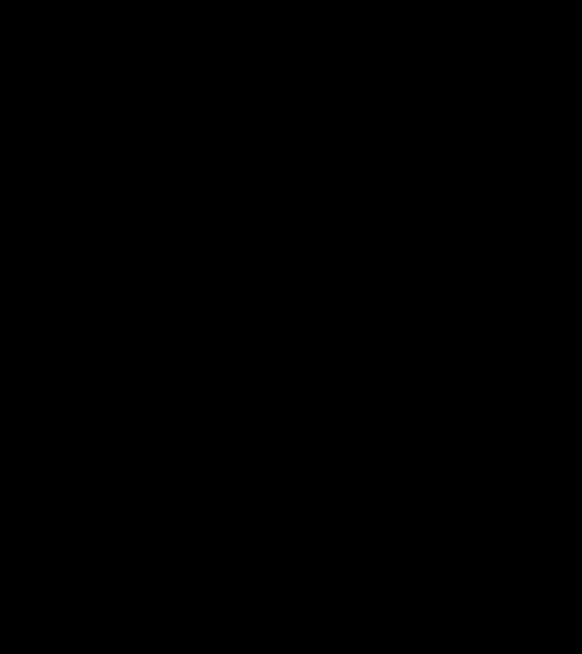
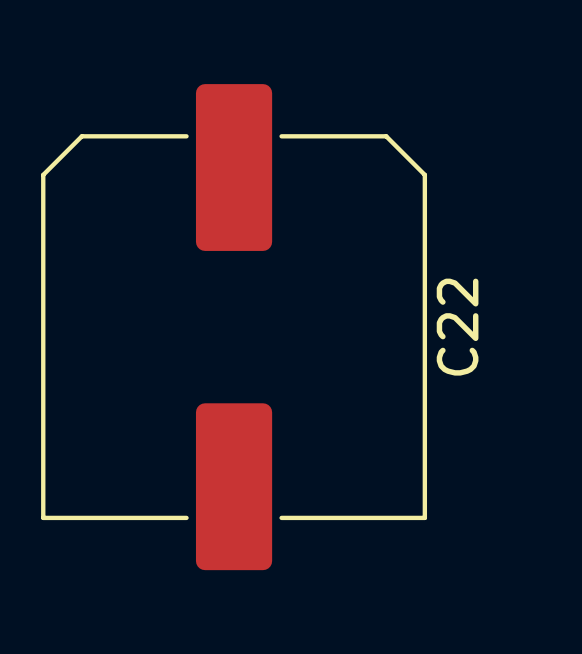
C22: none -> (234, 327)

